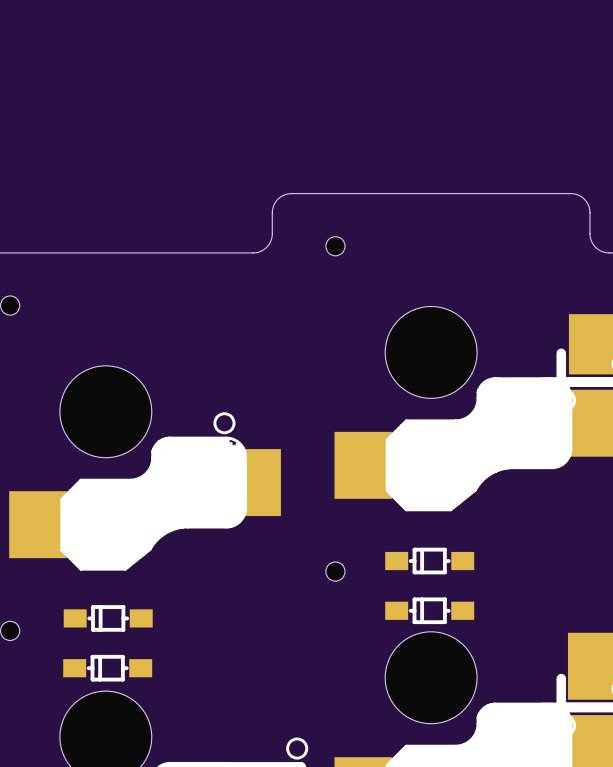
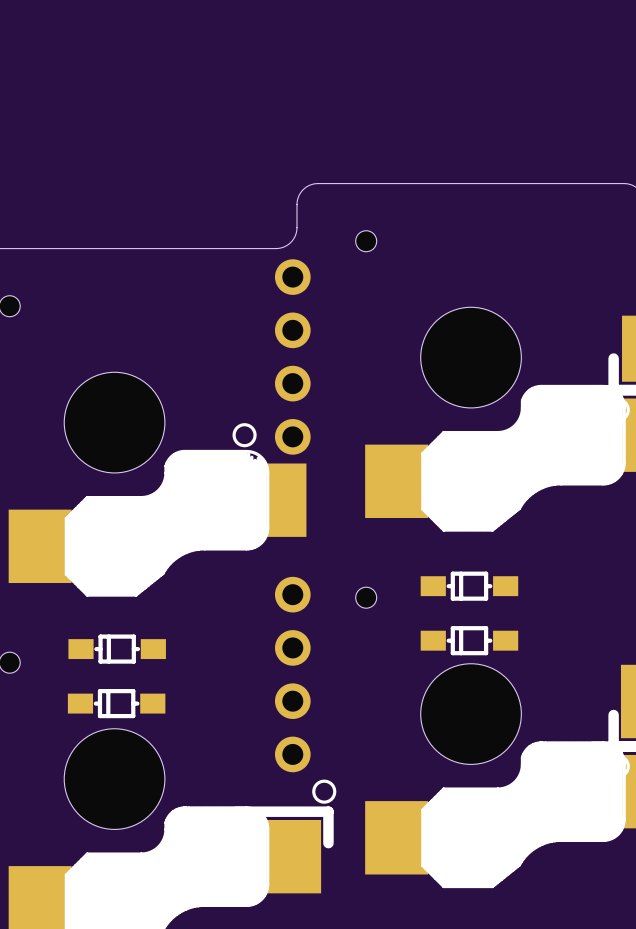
part: none -> (292, 356)
part: none -> (292, 674)

